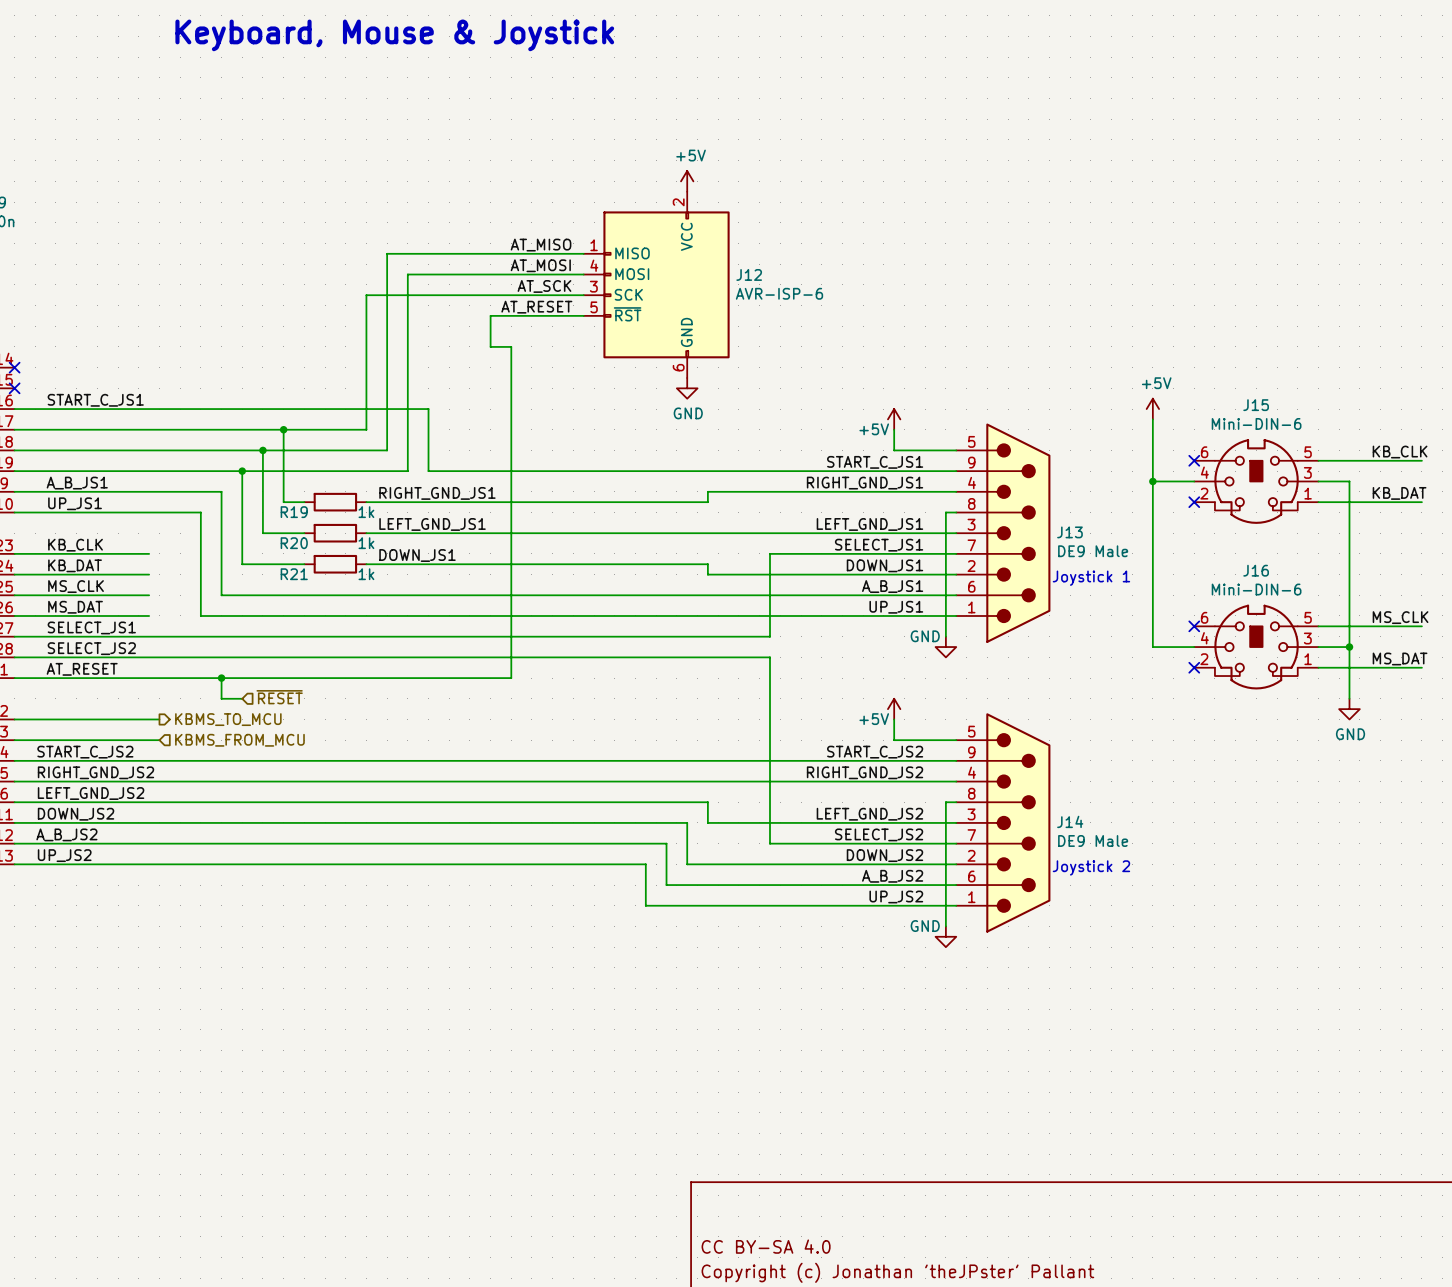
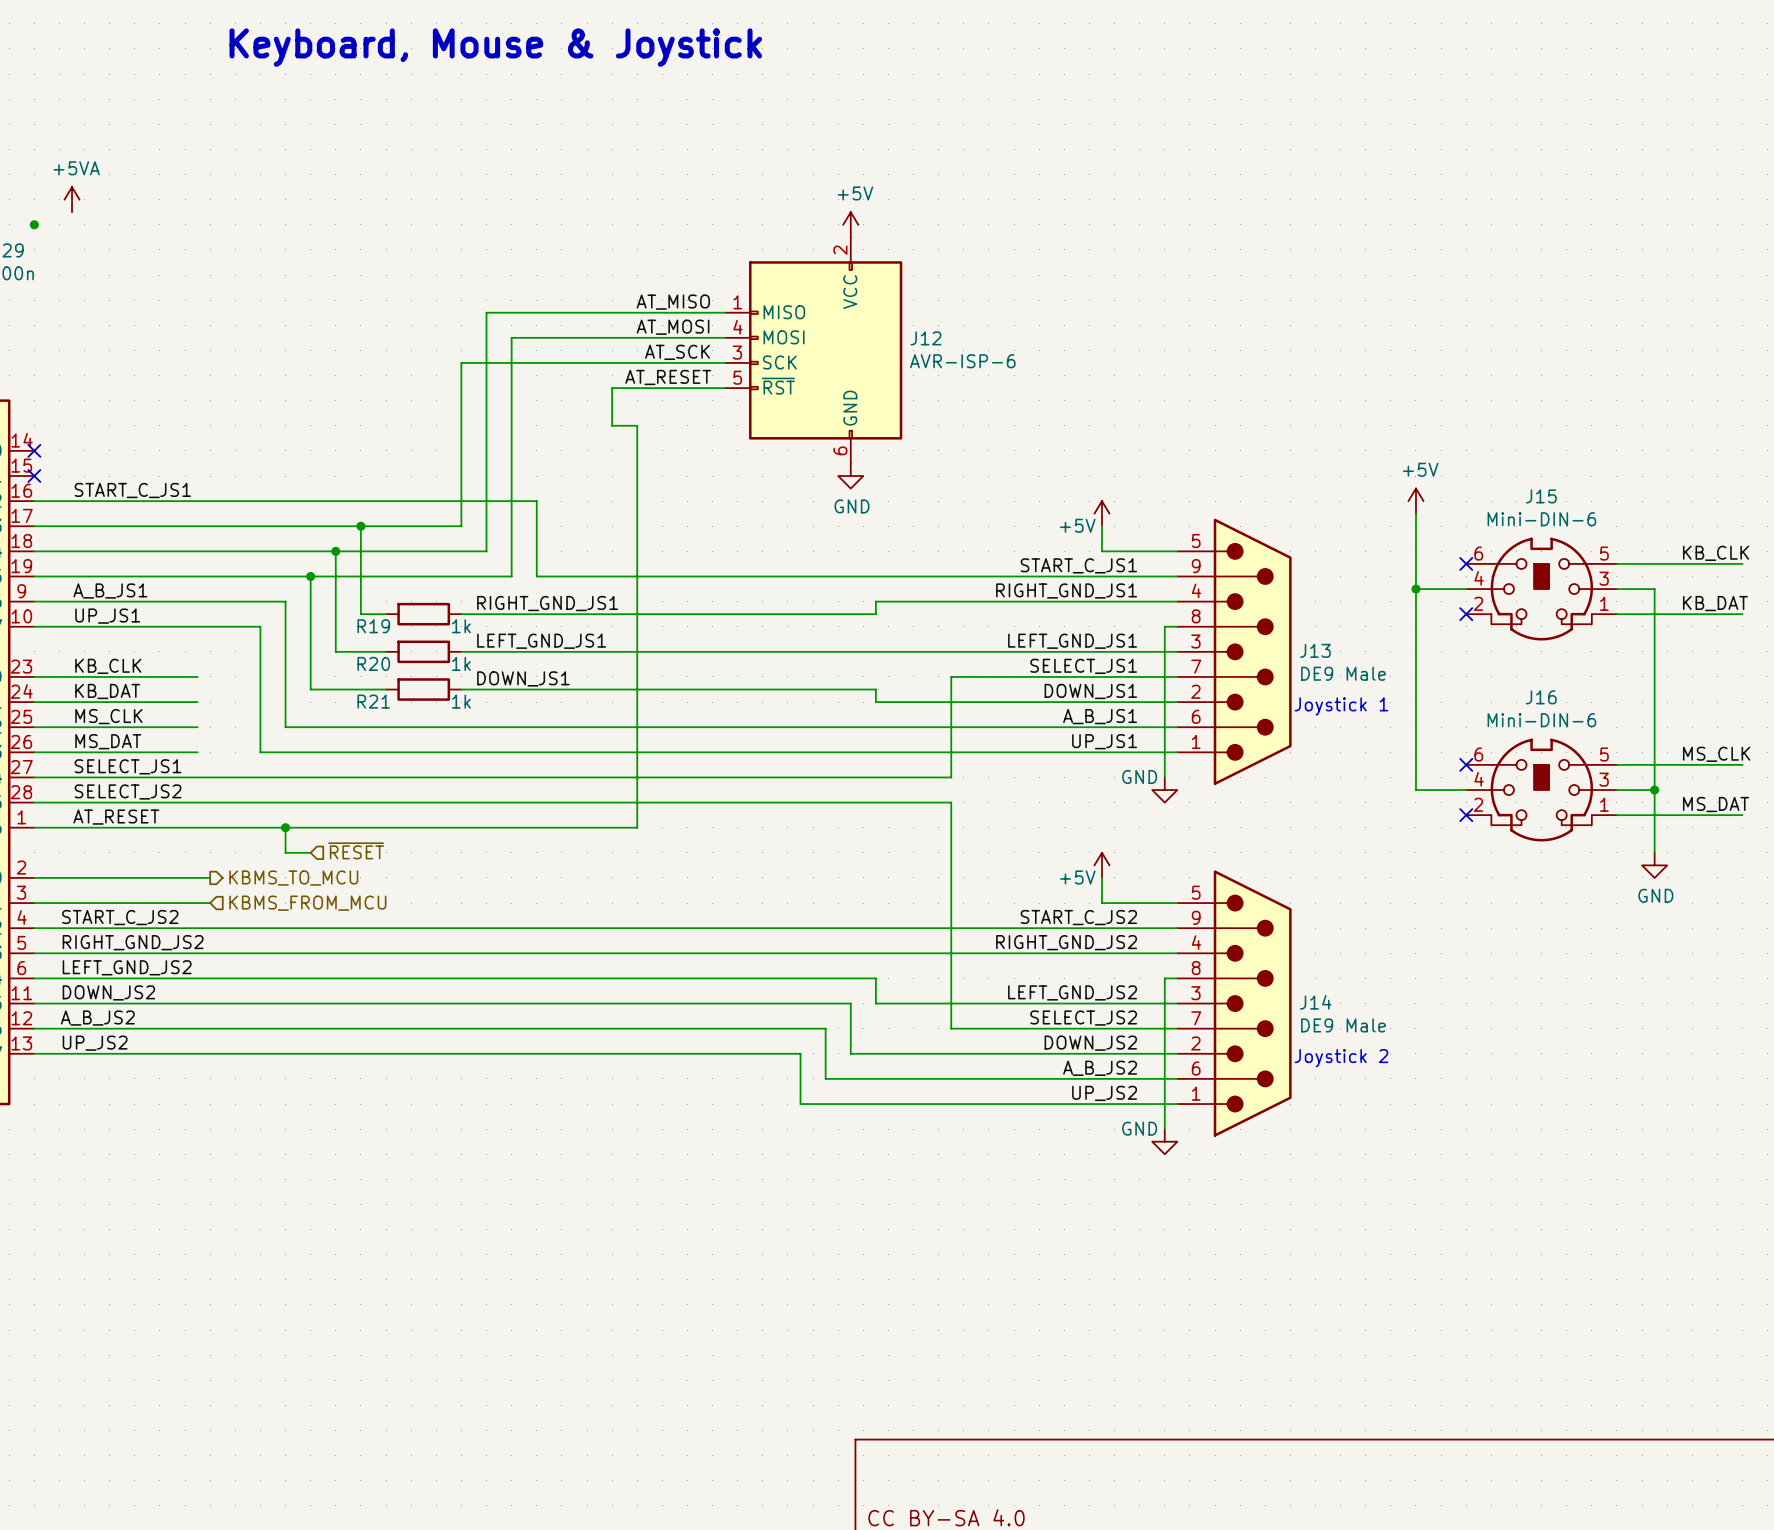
power symbol: none -> +5VA (72, 199)
junction: none -> (34, 224)

